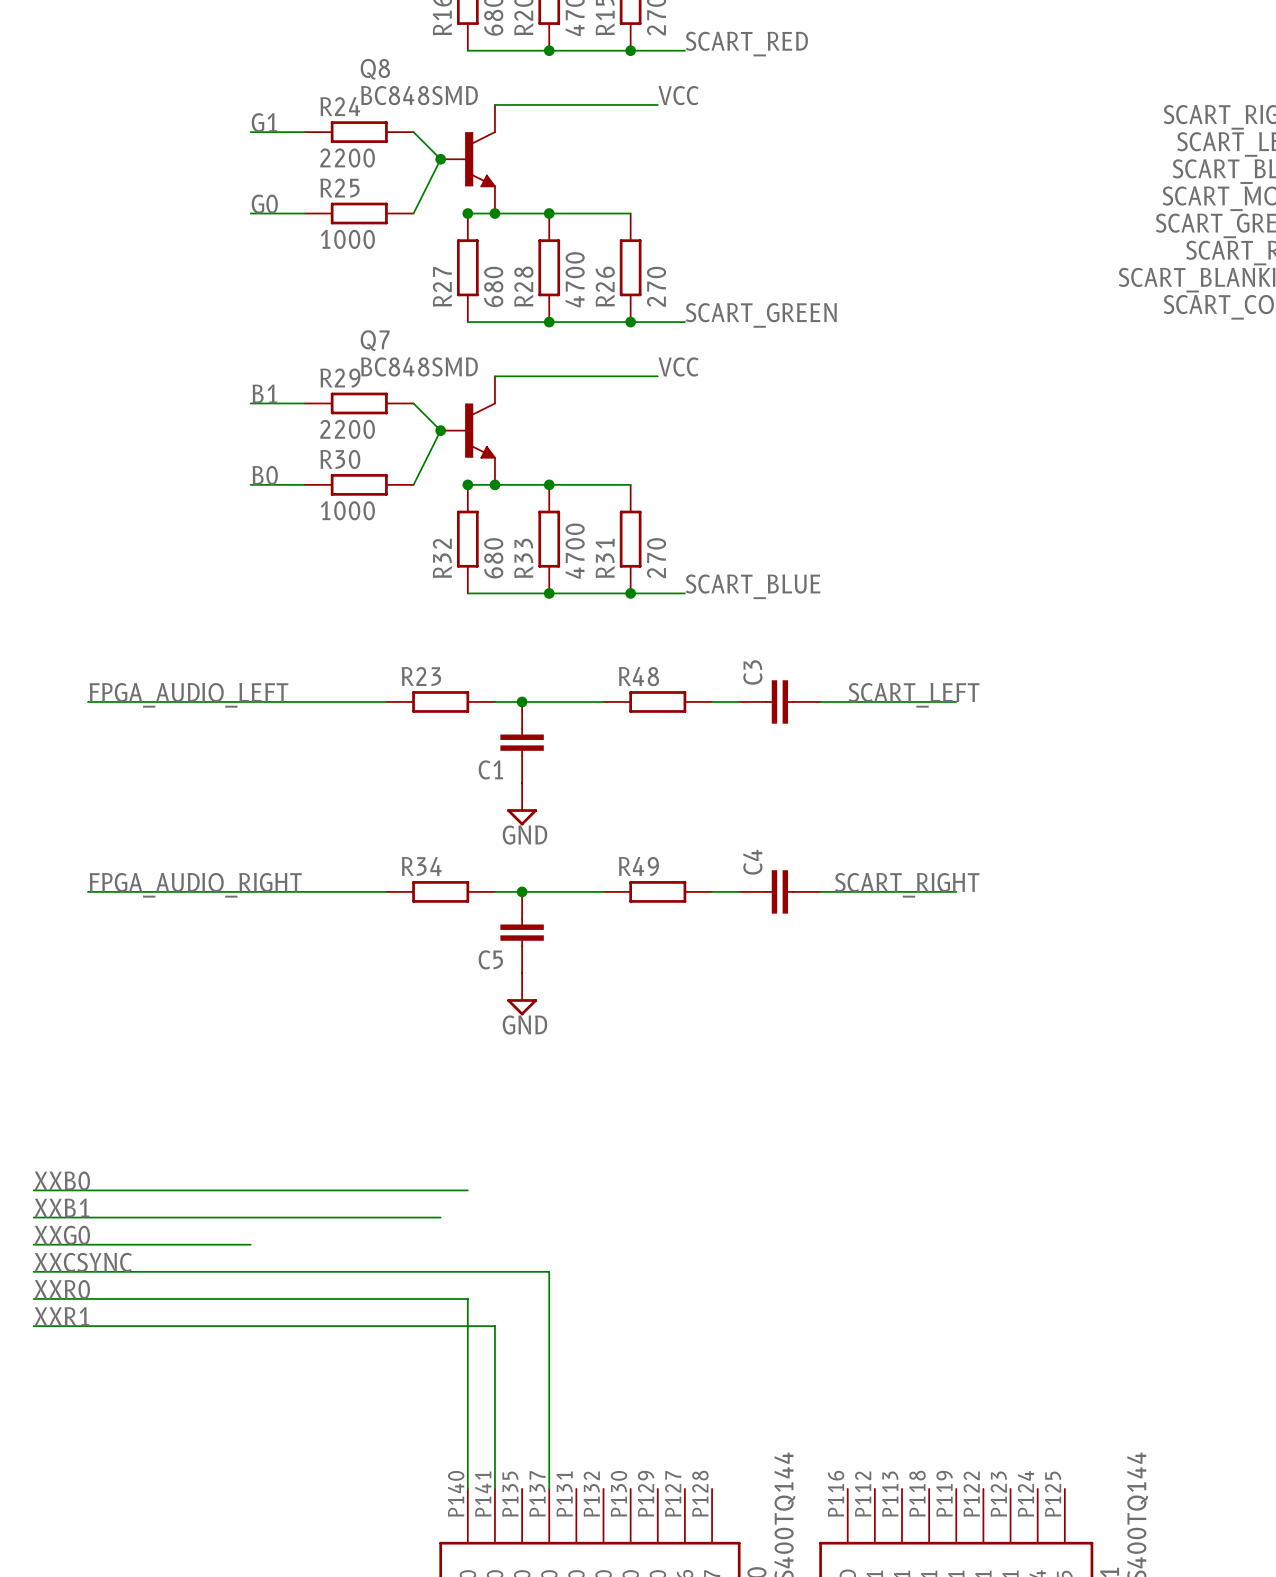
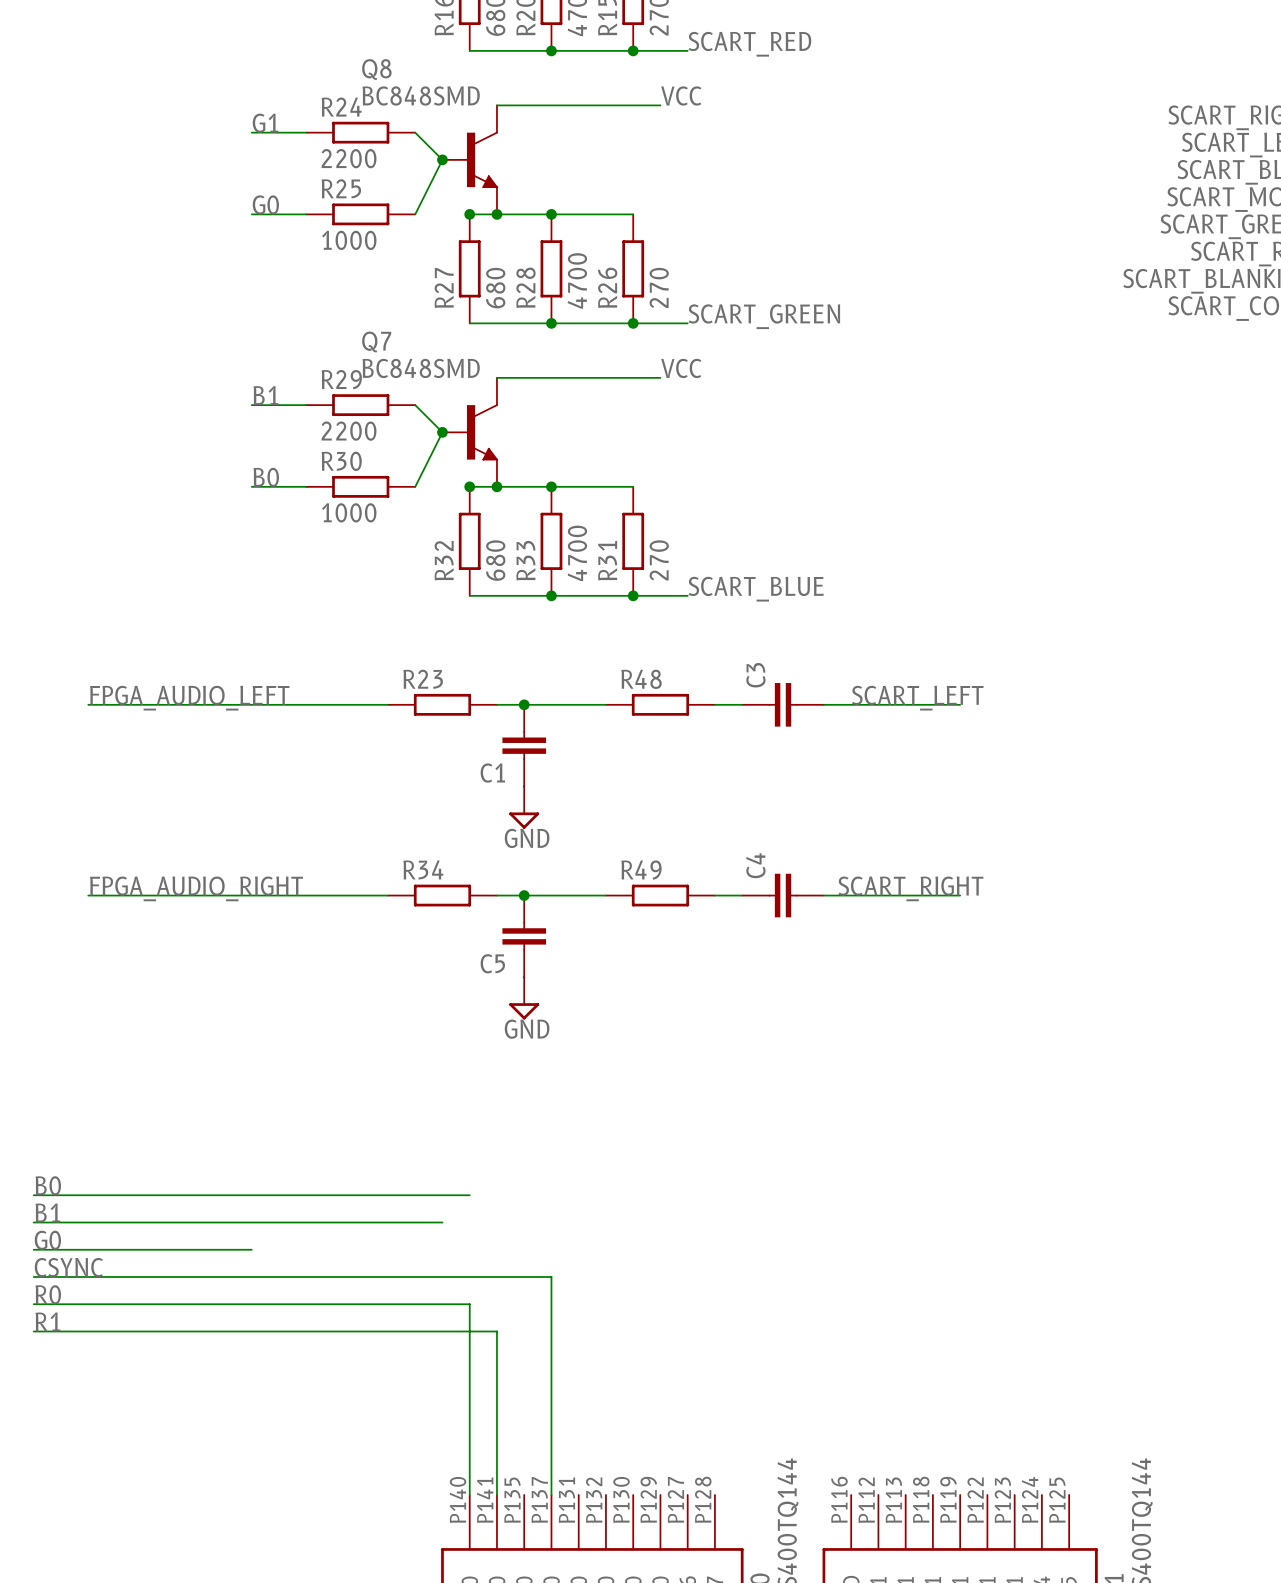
label: XXB0 (62, 1181) -> B0 (48, 1185)
label: XXB1 (61, 1208) -> B1 (47, 1212)
label: XXG0 (62, 1235) -> G0 (47, 1240)
label: XXCSYNC (83, 1262) -> CSYNC (68, 1267)
label: XXR0 (62, 1289) -> R0 (48, 1294)
label: XXR1 (61, 1316) -> R1 (47, 1321)

